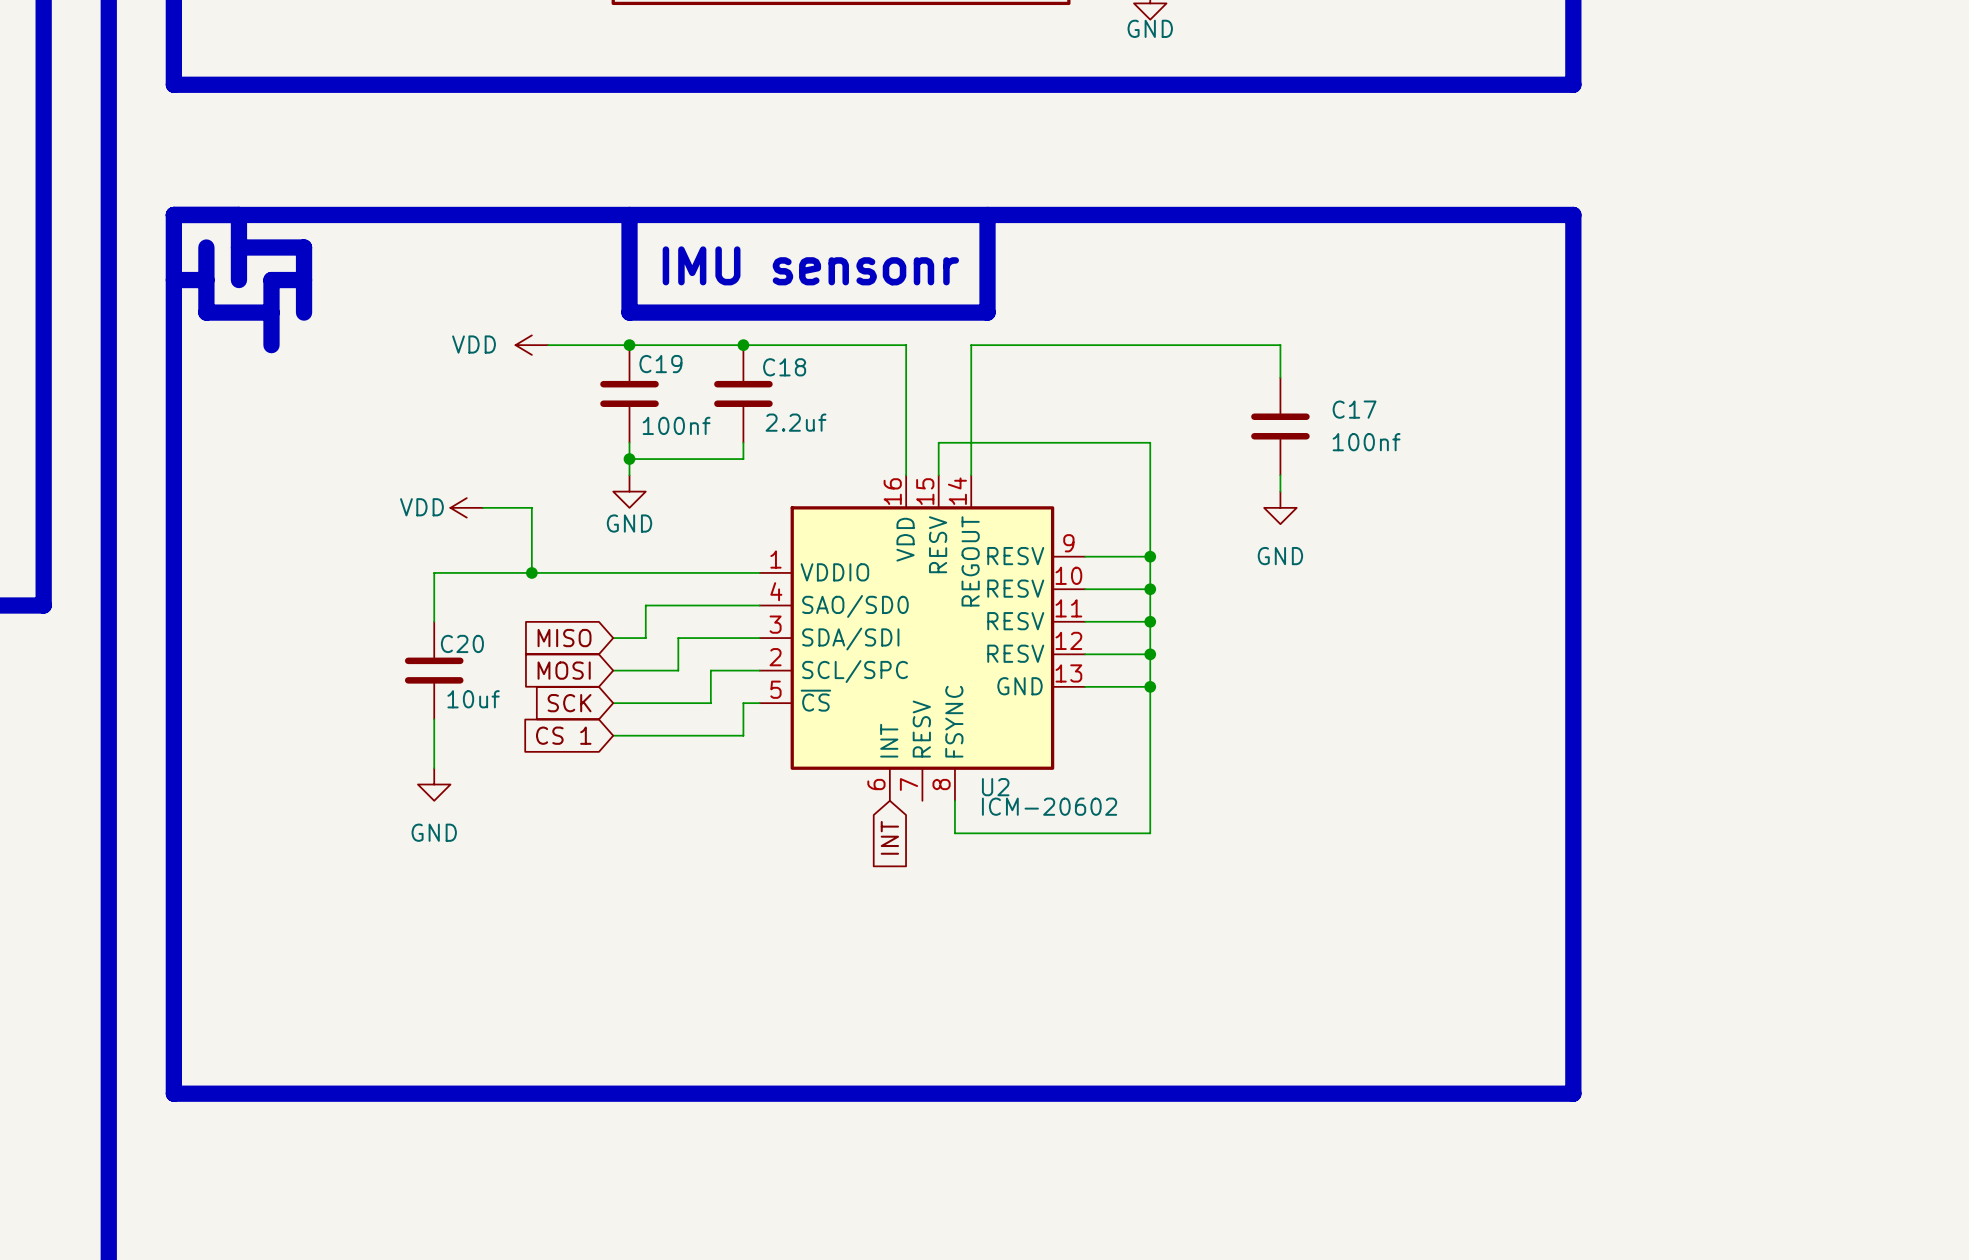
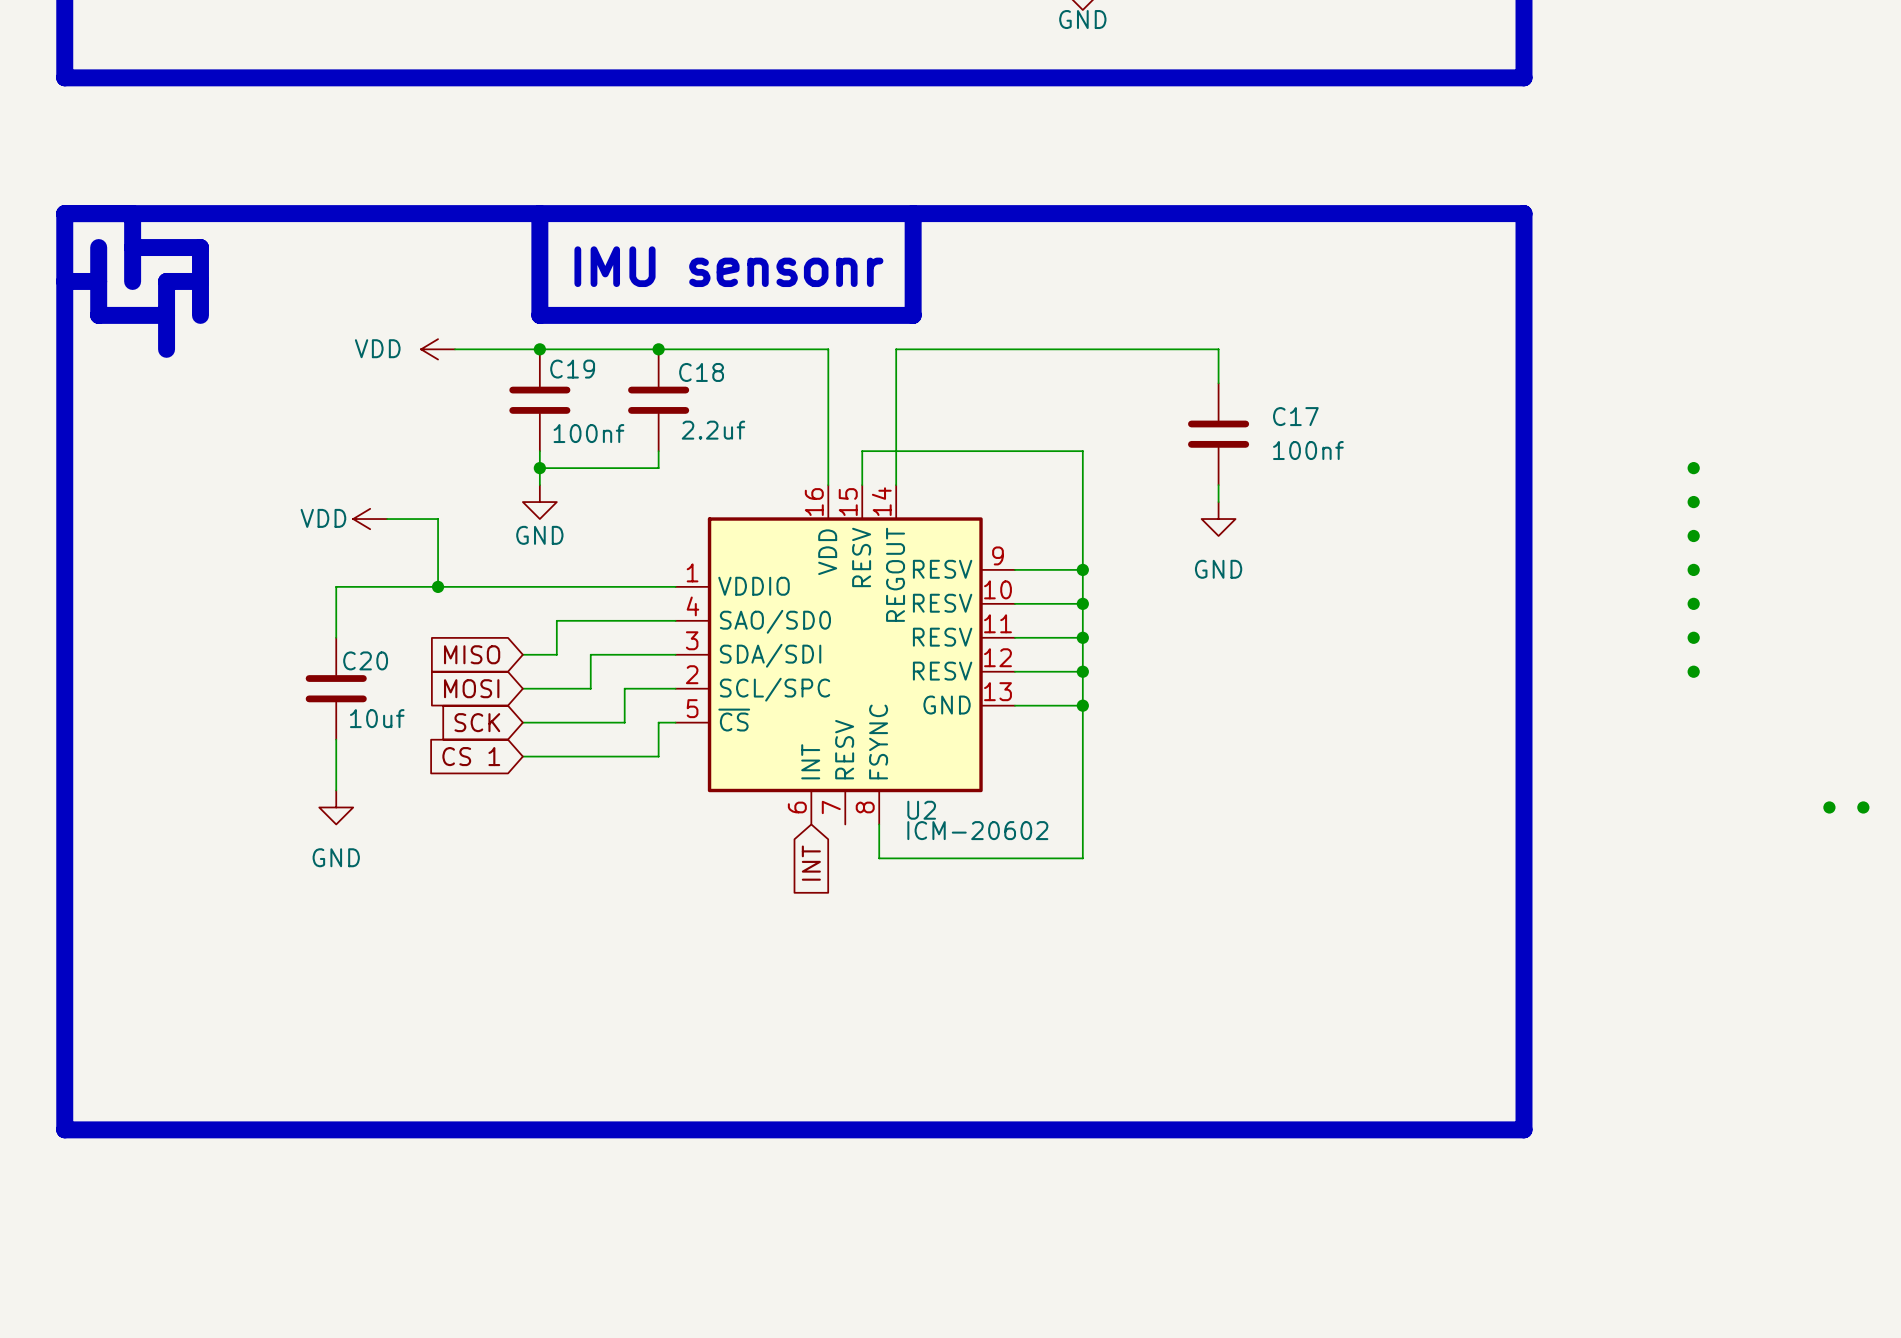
junction: none -> (1693, 468)
junction: none -> (1693, 502)
junction: none -> (1693, 535)
junction: none -> (1693, 569)
junction: none -> (1693, 603)
junction: none -> (1693, 637)
junction: none -> (1693, 671)
junction: none -> (1829, 807)
junction: none -> (1863, 807)

